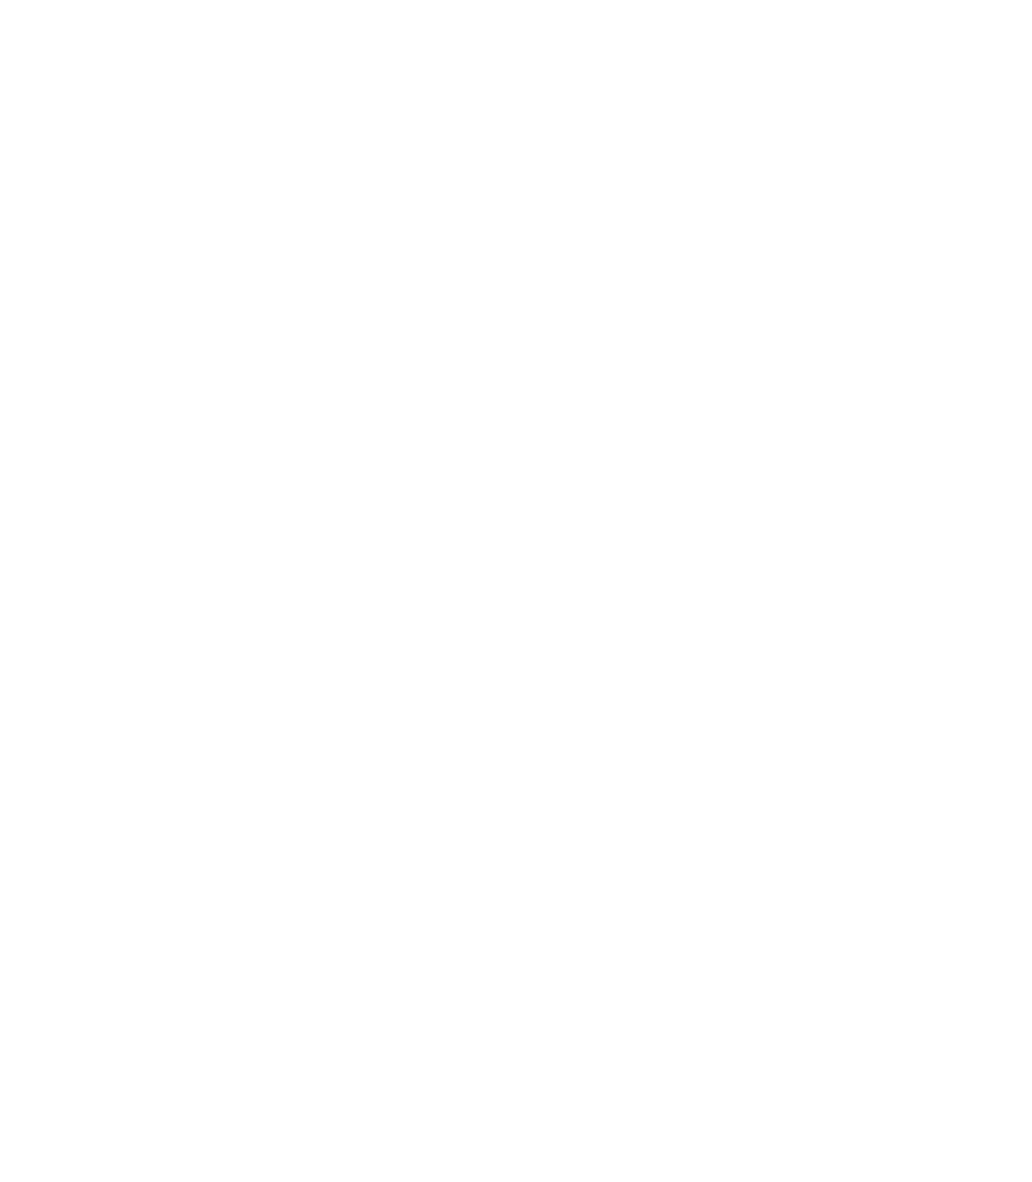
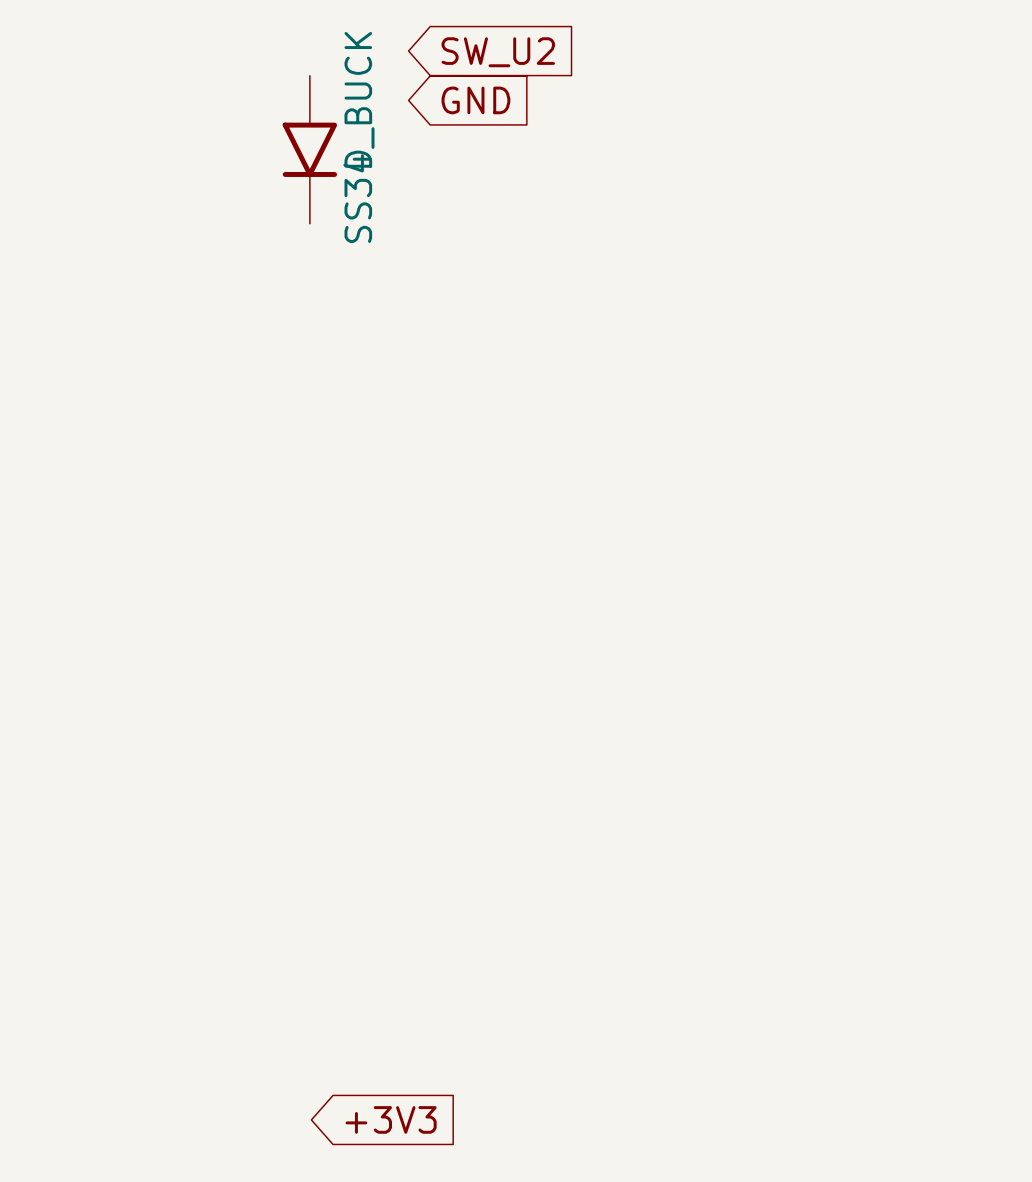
global label: none -> SW_U2 (498, 52)
global label: none -> GND (475, 100)
D_BUCK: none -> SS34 (309, 149)
global label: none -> +3V3 (391, 1119)

